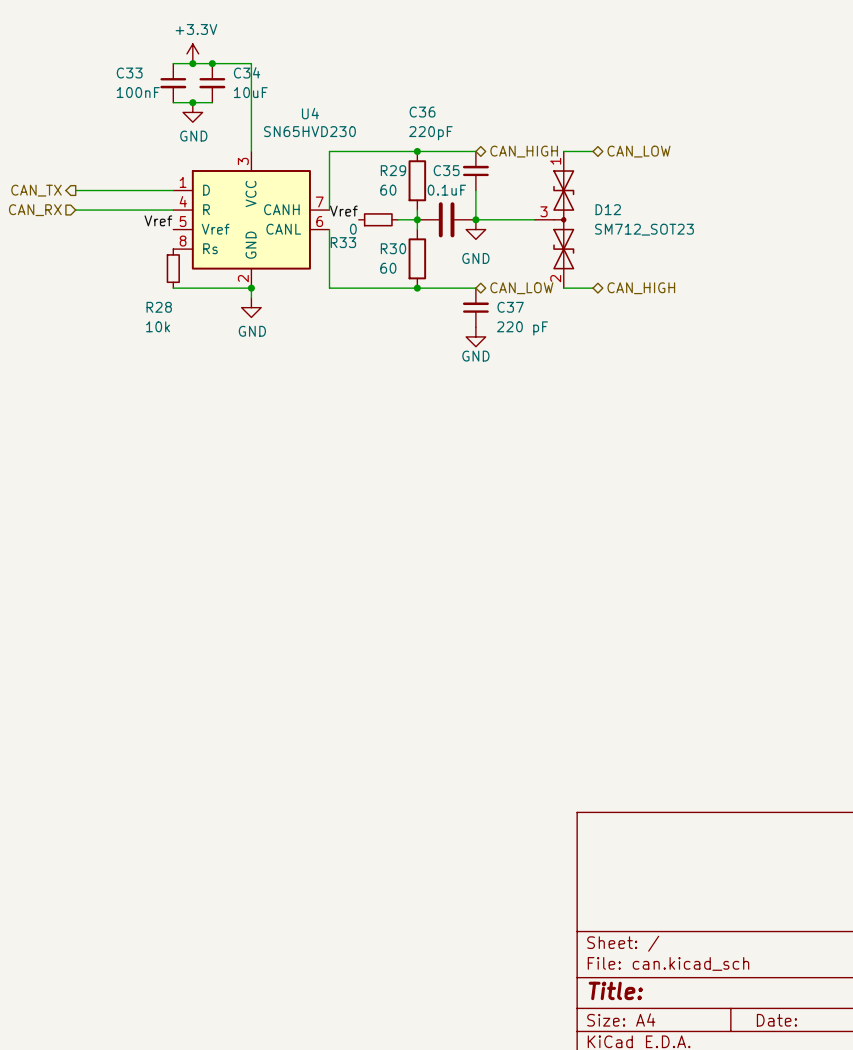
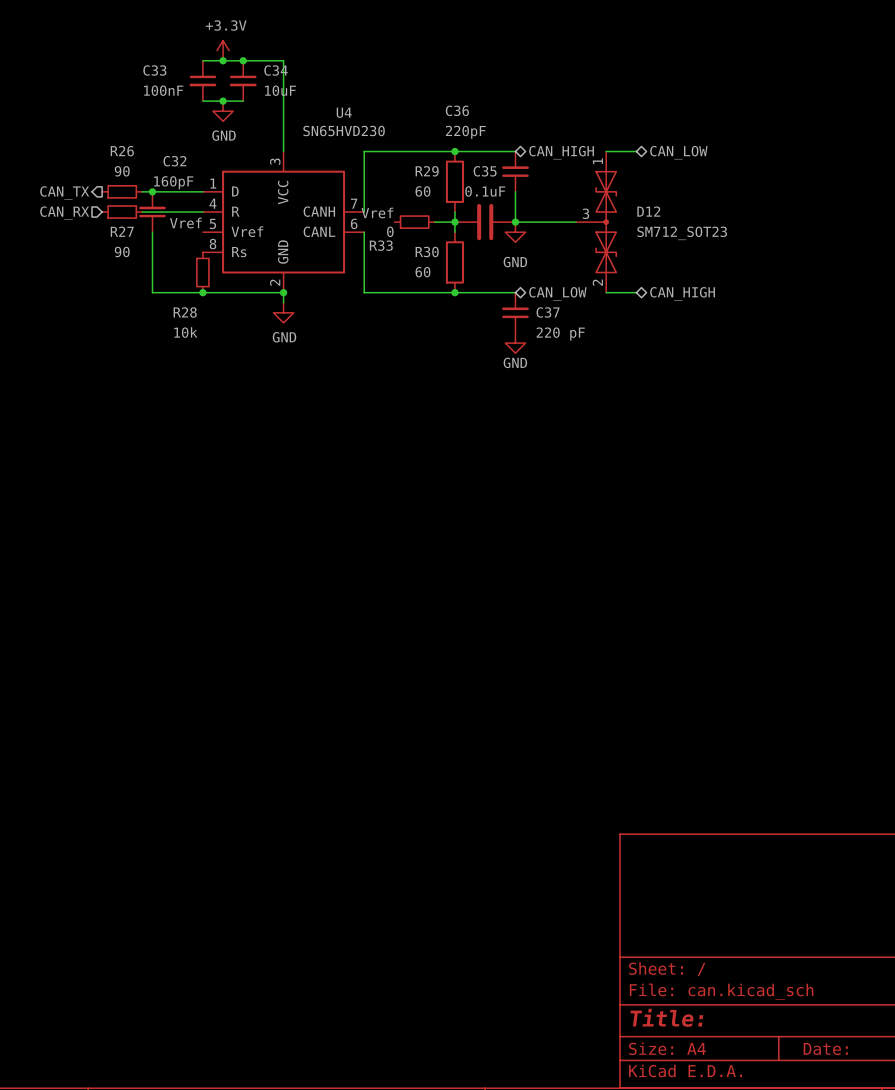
wire: (75, 190) (114, 190) -> none
R26: none -> 90 (122, 191)
junction: none -> (152, 191)
wire: (75, 210) (114, 210) -> none
R27: none -> 90 (122, 212)
C32: none -> 160pF (152, 212)
wire: none -> (152, 232) (152, 292) (202, 292)
junction: none -> (202, 292)

